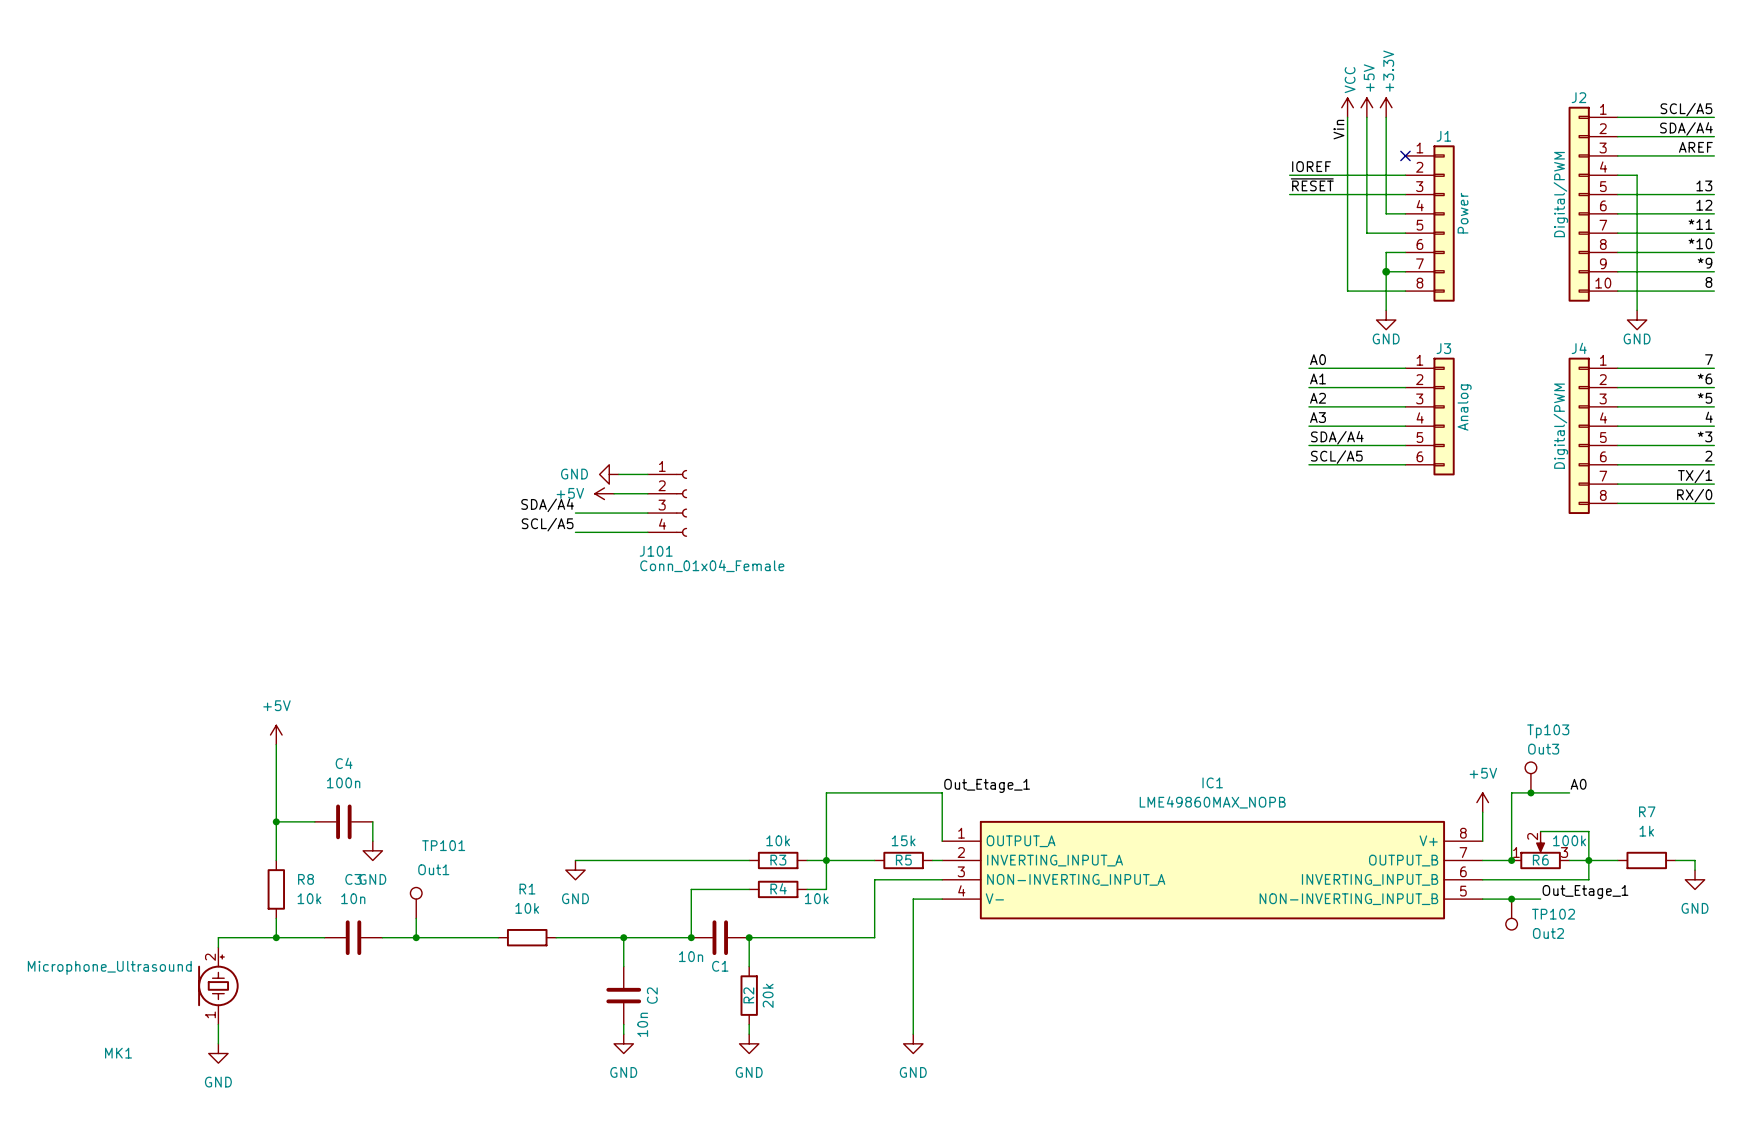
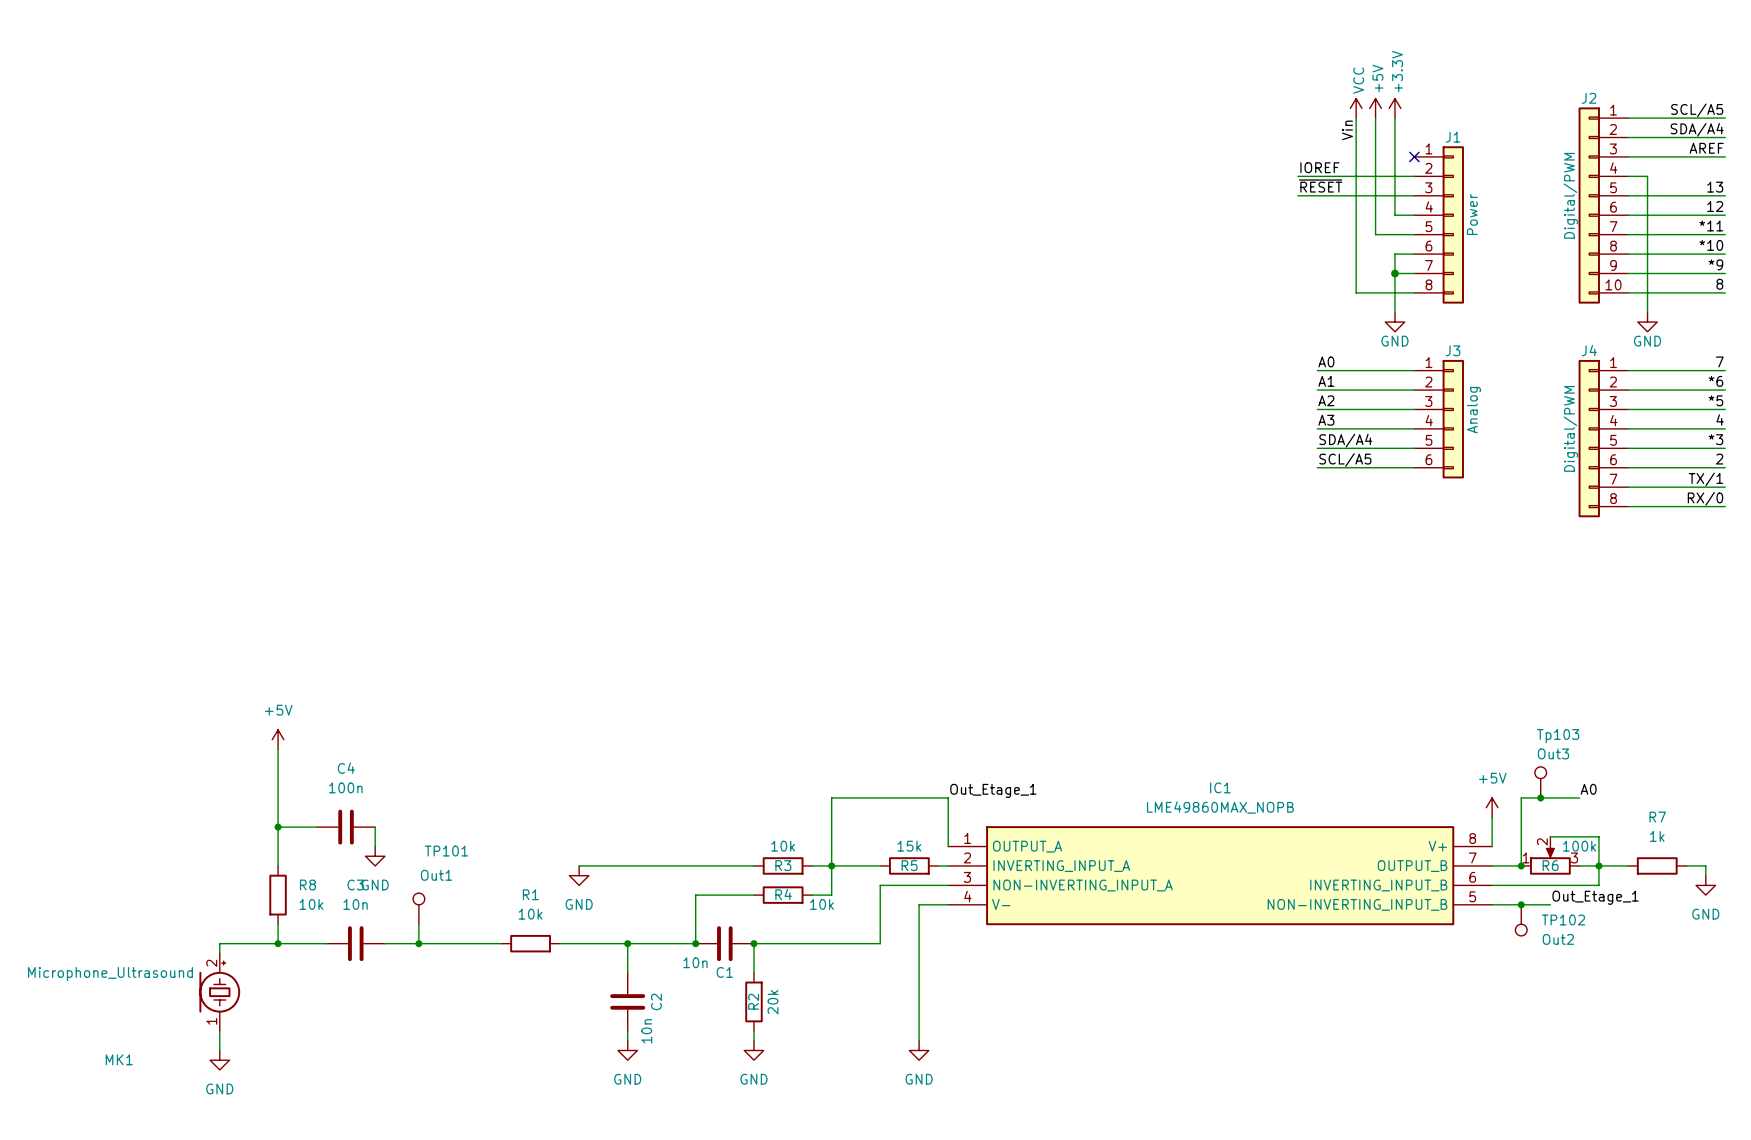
power symbol: GND (609, 474) -> none
wire: (618, 474) (647, 474) -> none
power symbol: +5V (604, 493) -> none
wire: (614, 493) (647, 493) -> none
J101: Conn_01x04_Female (667, 503) -> none
label: SDA/A4 (547, 505) -> none
wire: (575, 513) (647, 513) -> none
label: SCL/A5 (547, 524) -> none
wire: (575, 532) (647, 532) -> none

